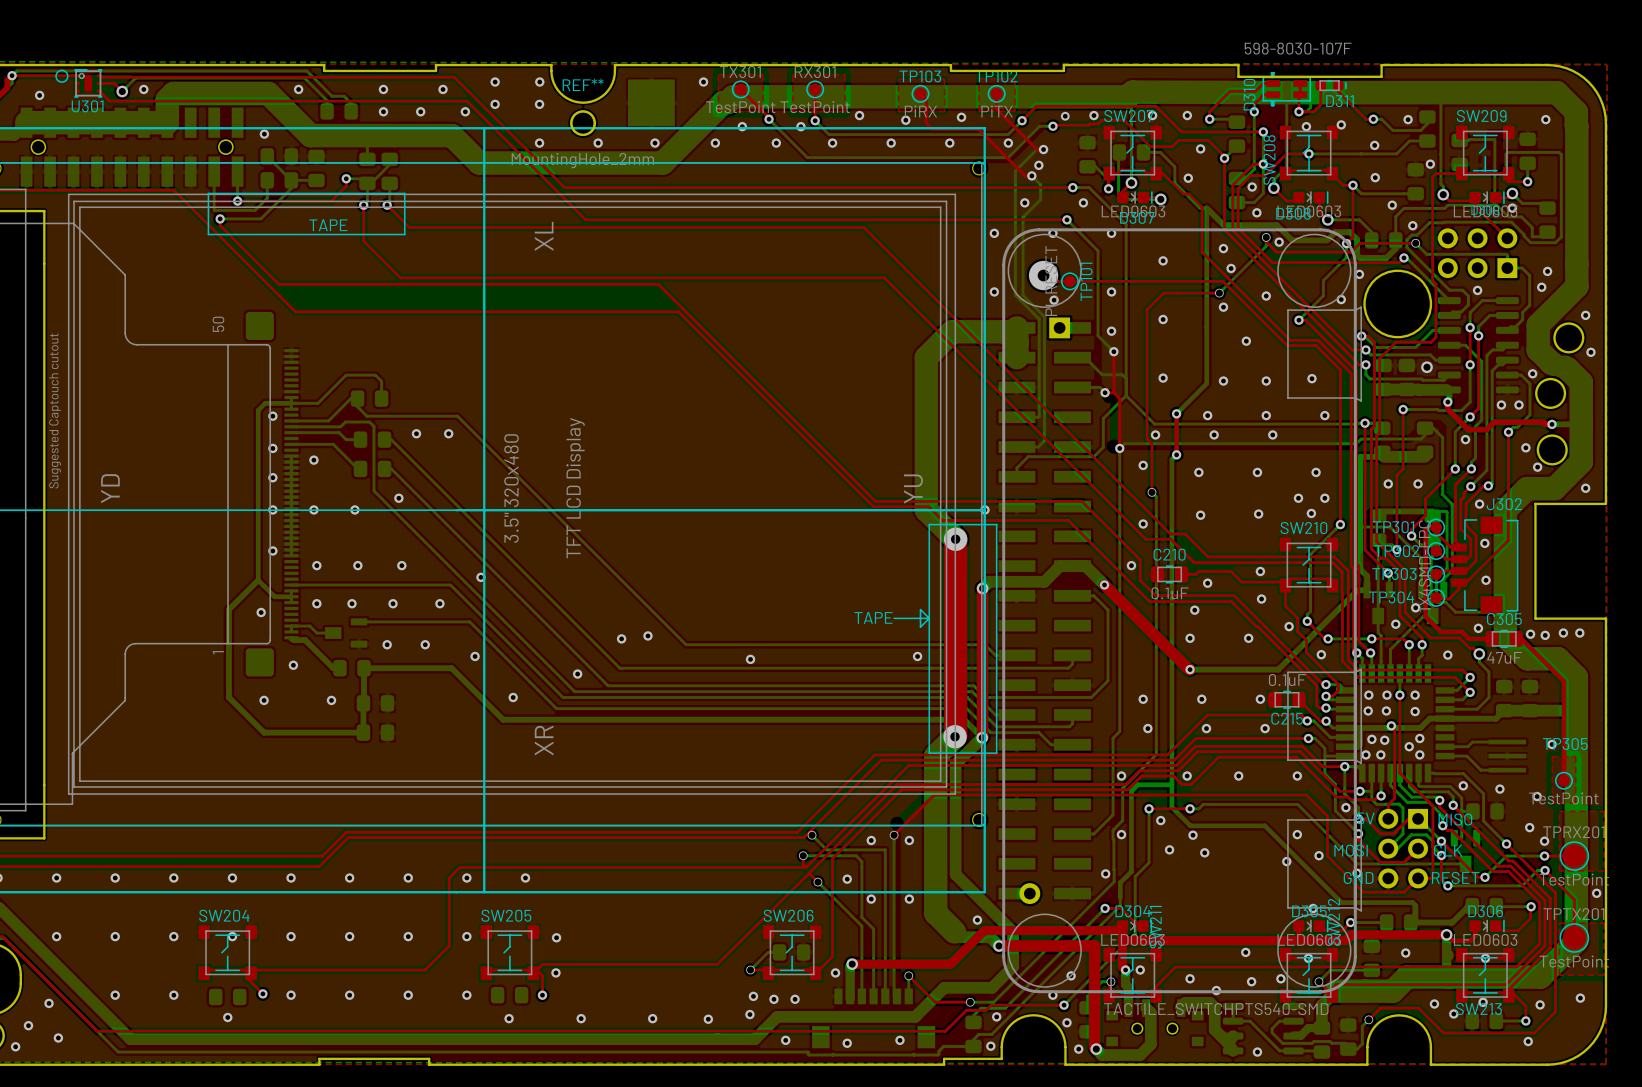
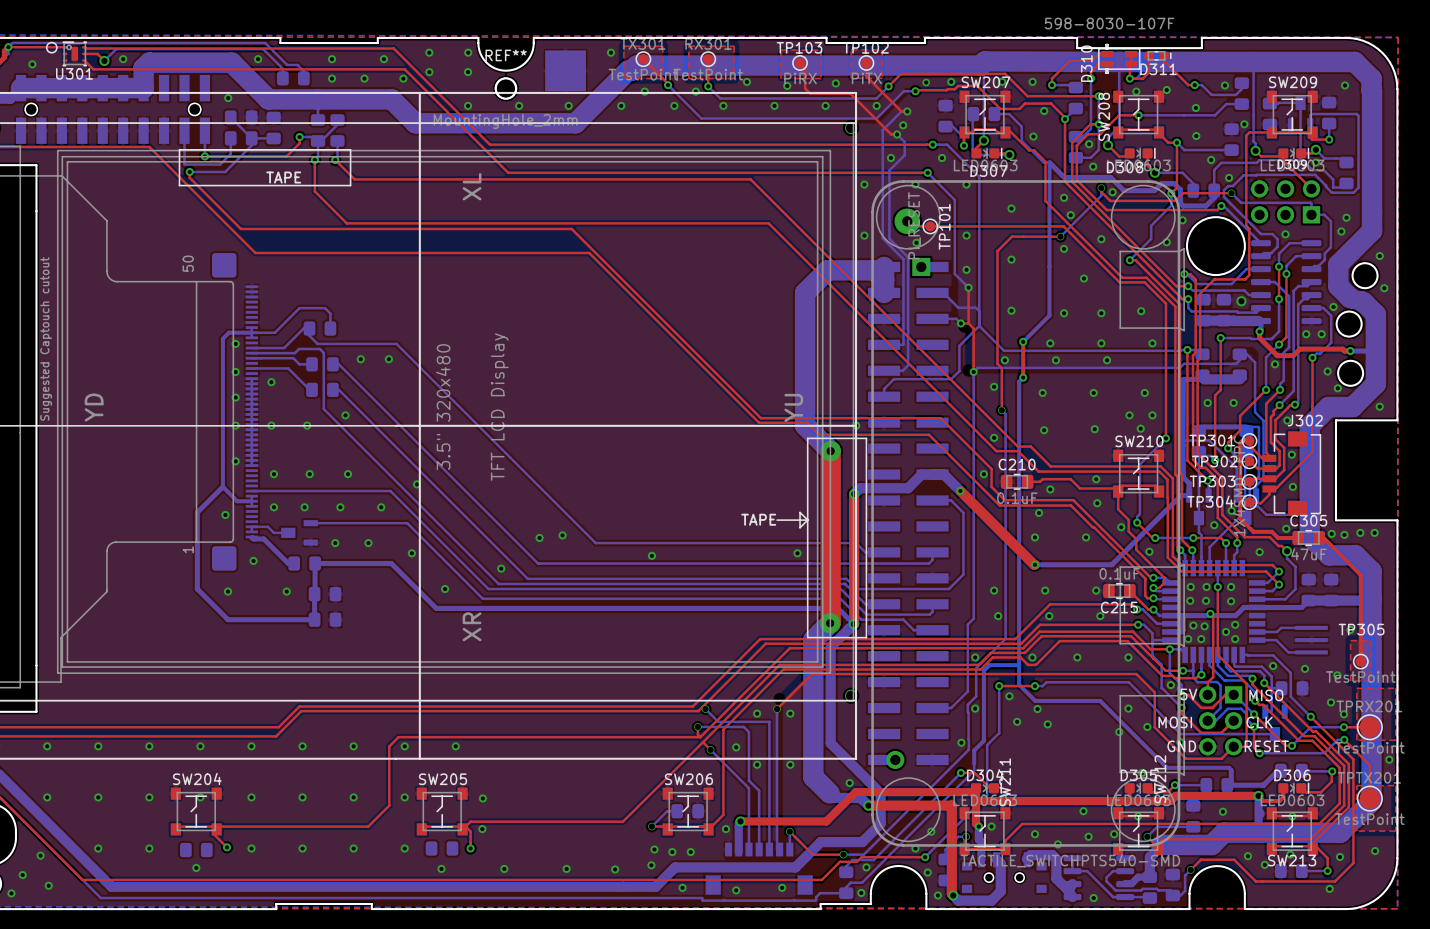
part: none -> (1300, 114)

